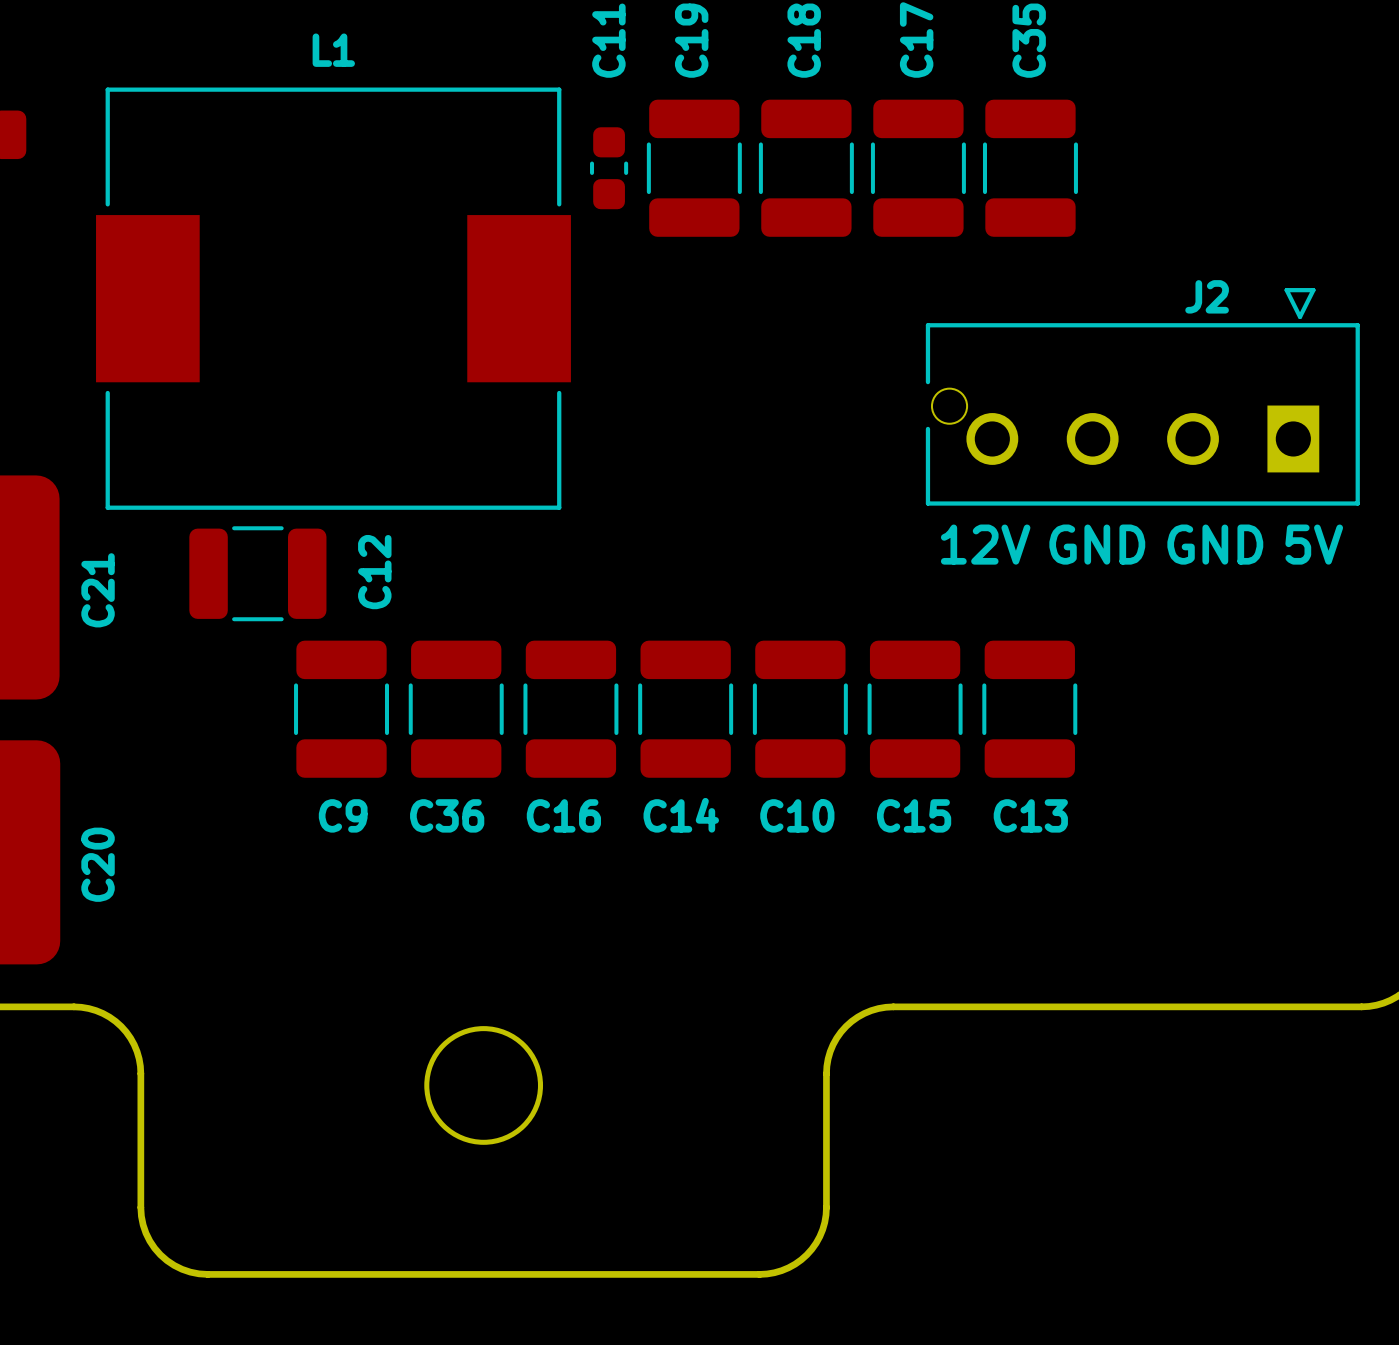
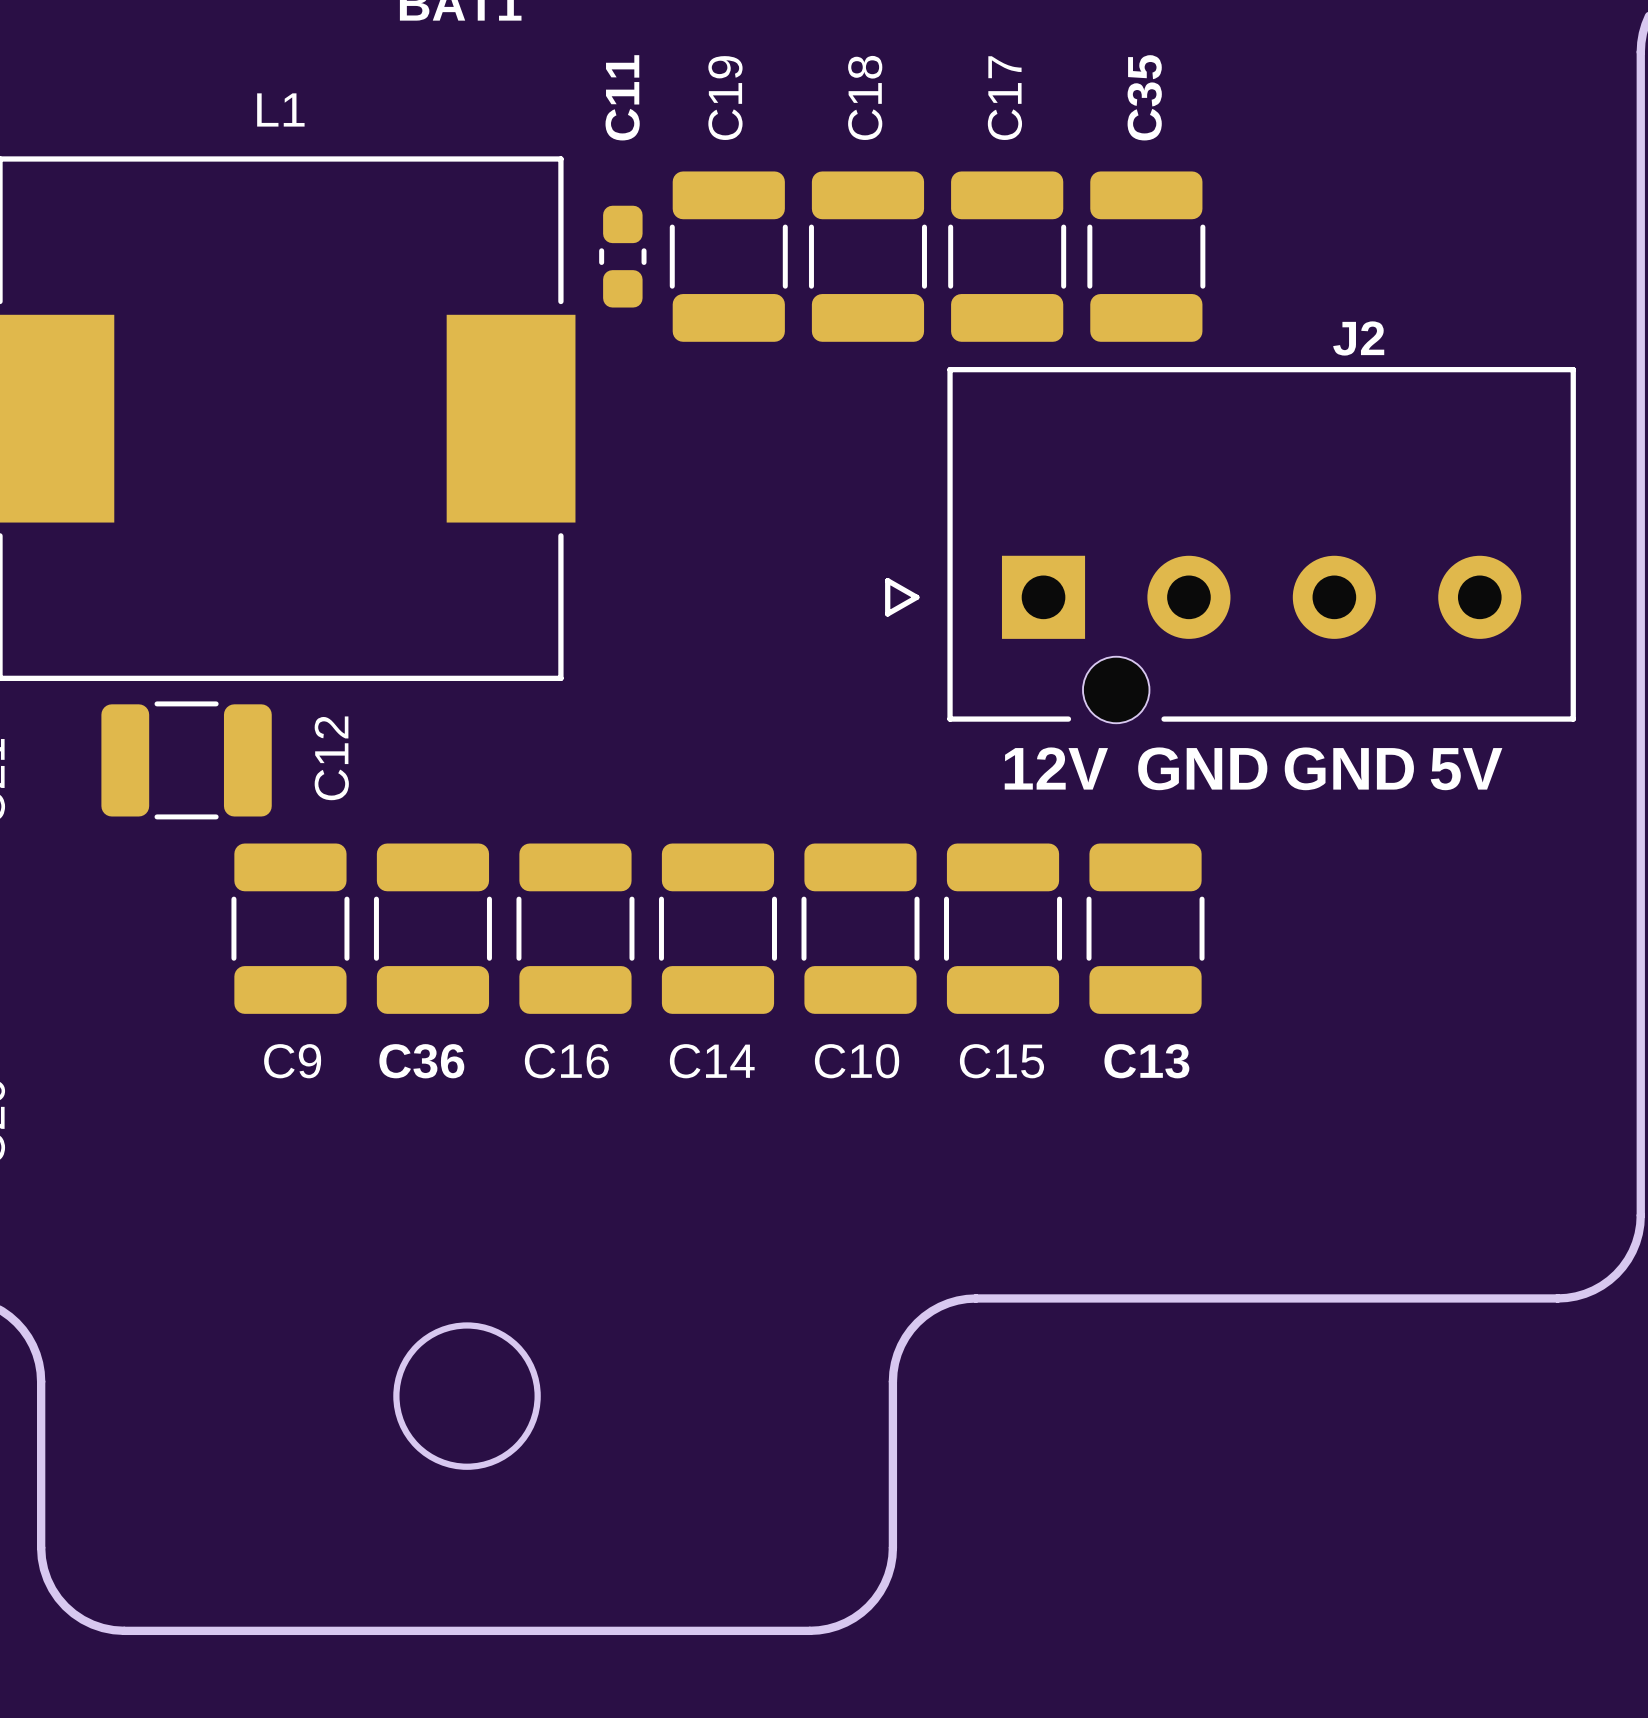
J2 footprint: [925, 288, 1360, 506] -> [885, 367, 1576, 724]
J2 name position: J2 (1207, 296) -> J2 (1358, 338)
text position: 12V (985, 544) -> 12V (1056, 768)
text position: GND (1097, 544) -> GND (1202, 768)
text position: GND (1215, 544) -> GND (1349, 768)
text position: 5V (1314, 544) -> 5V (1466, 769)

